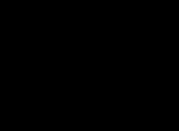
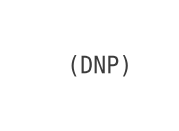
text: none -> (DNP) (99, 65)

